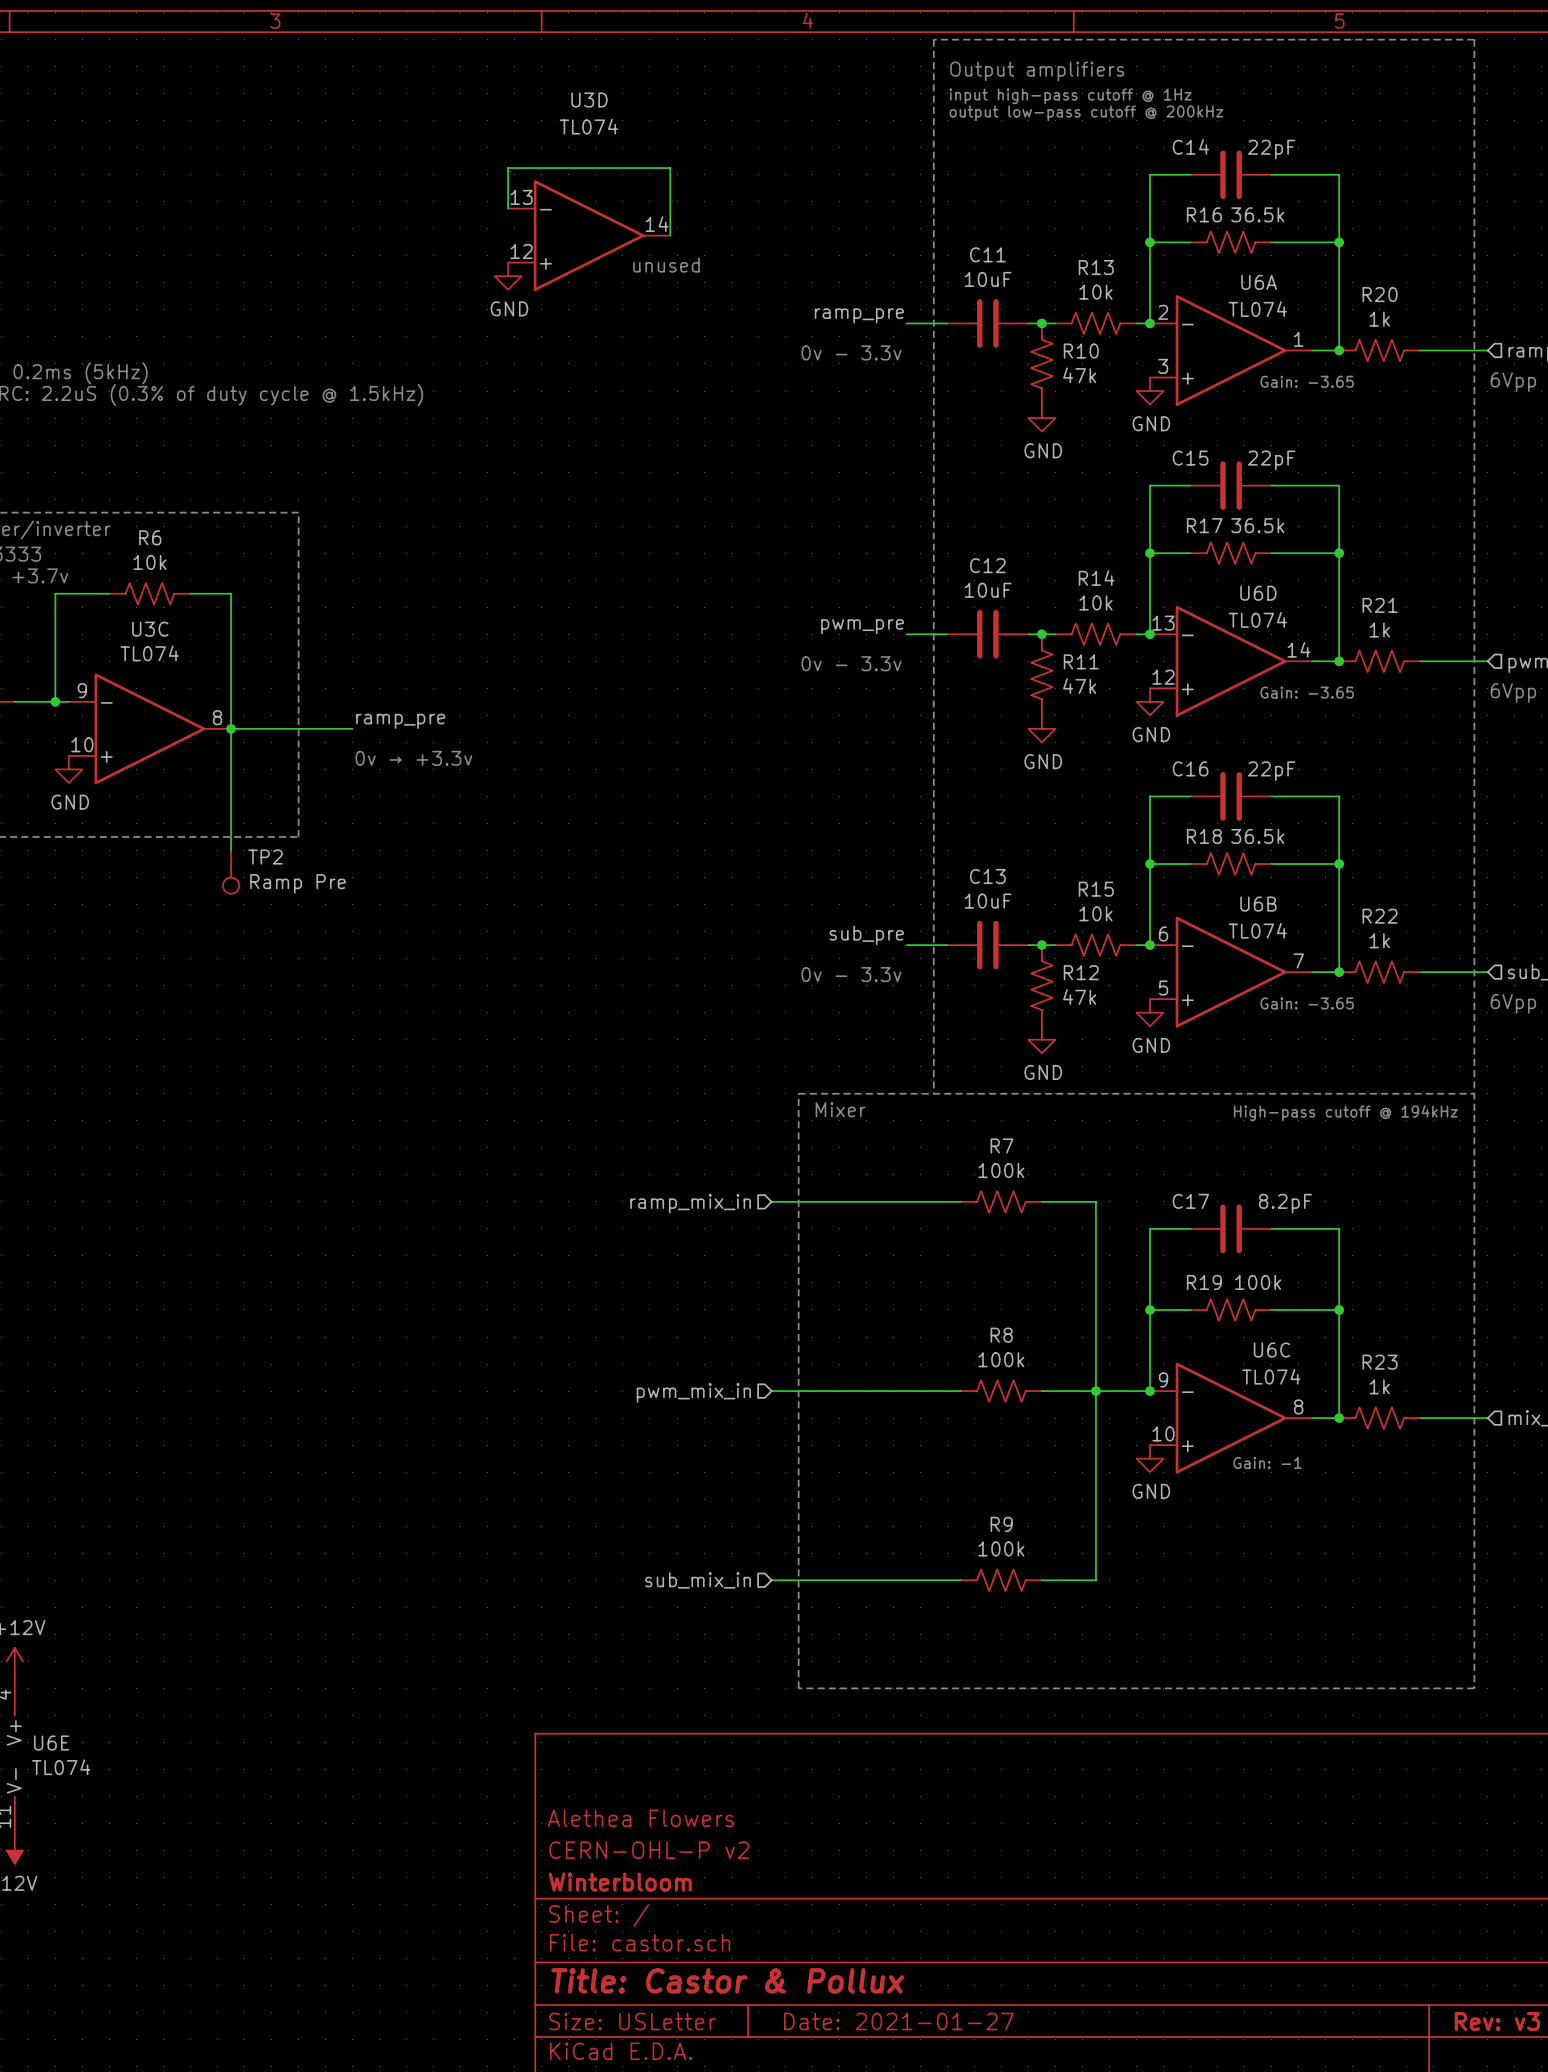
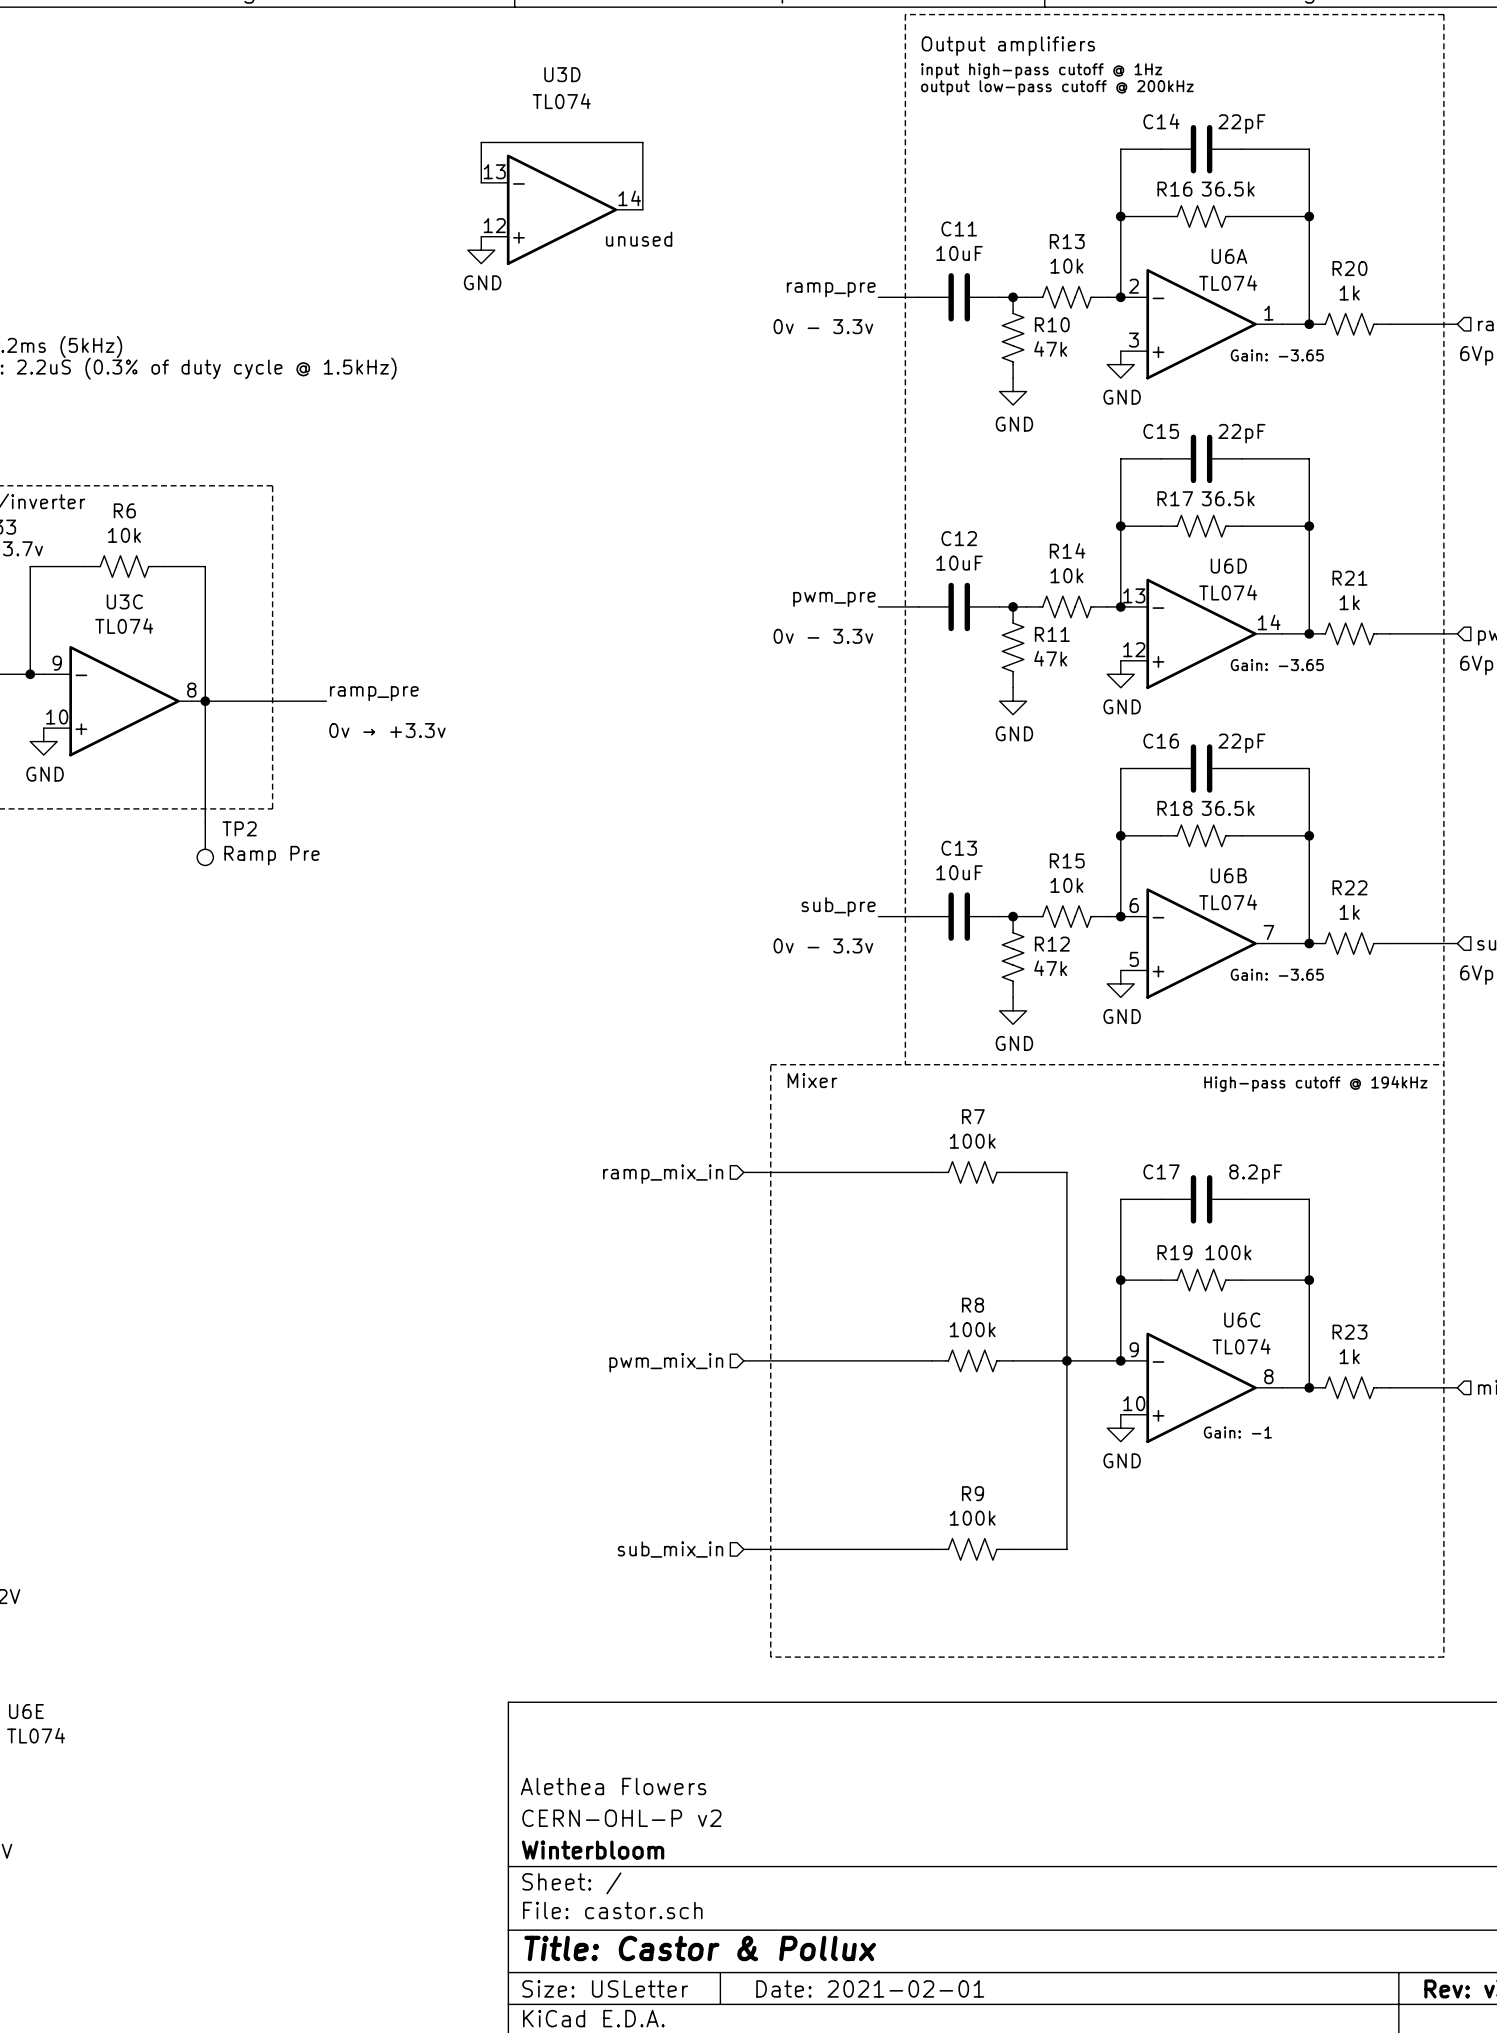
title block: Date: 2021-01-27 (898, 2021) -> Date: 2021-02-01 (870, 1988)

